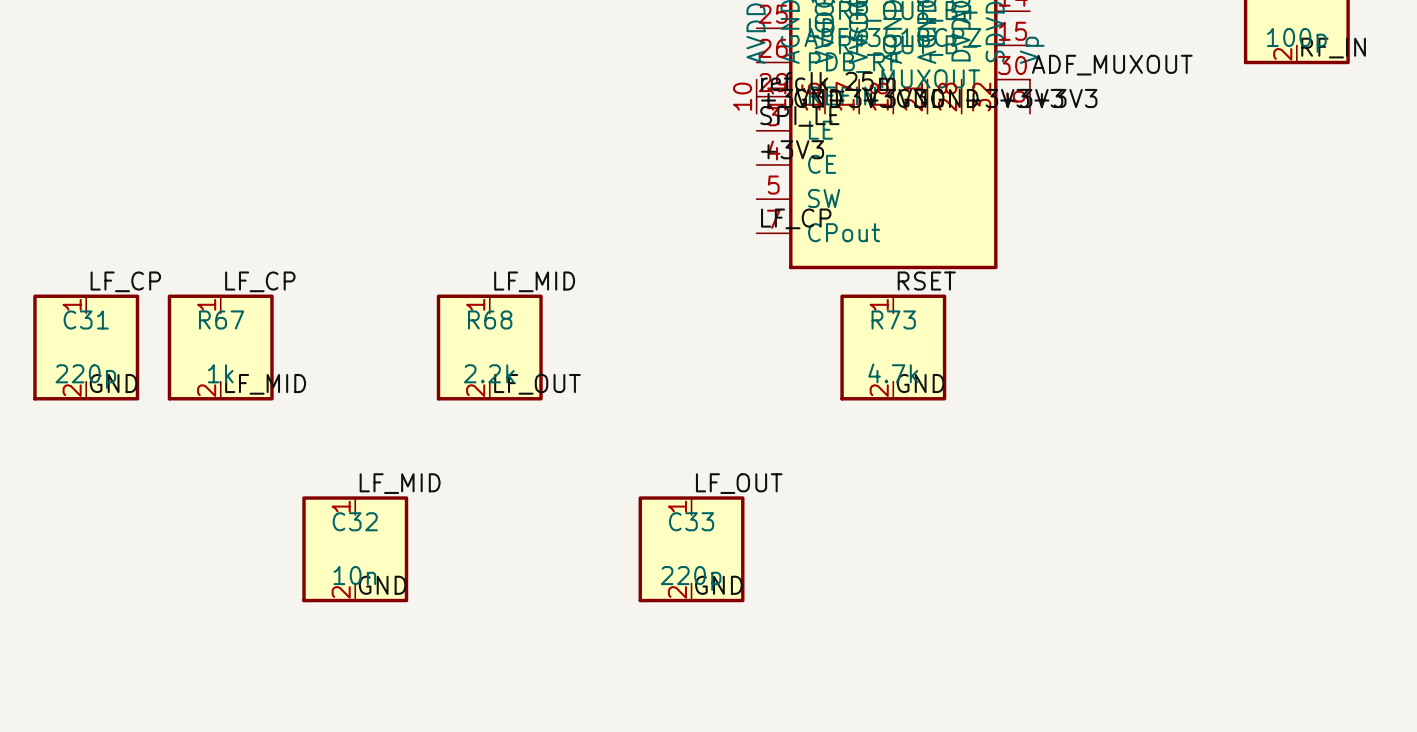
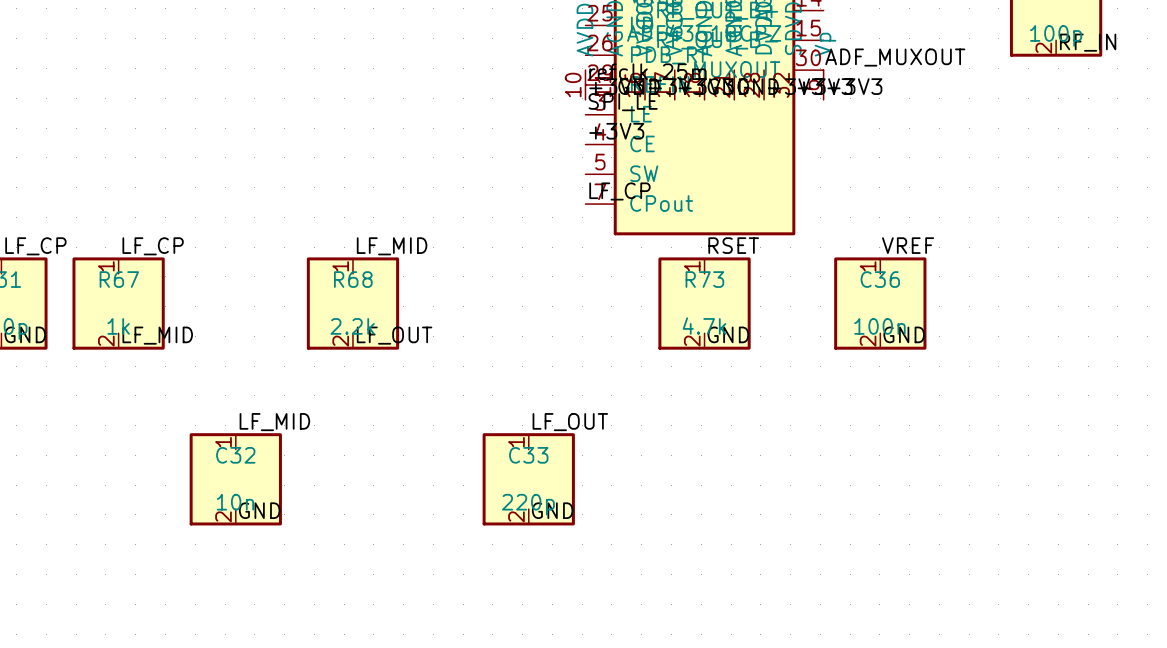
label: none -> VREF (908, 245)
C36: none -> 100n (880, 303)
label: none -> GND (904, 334)

